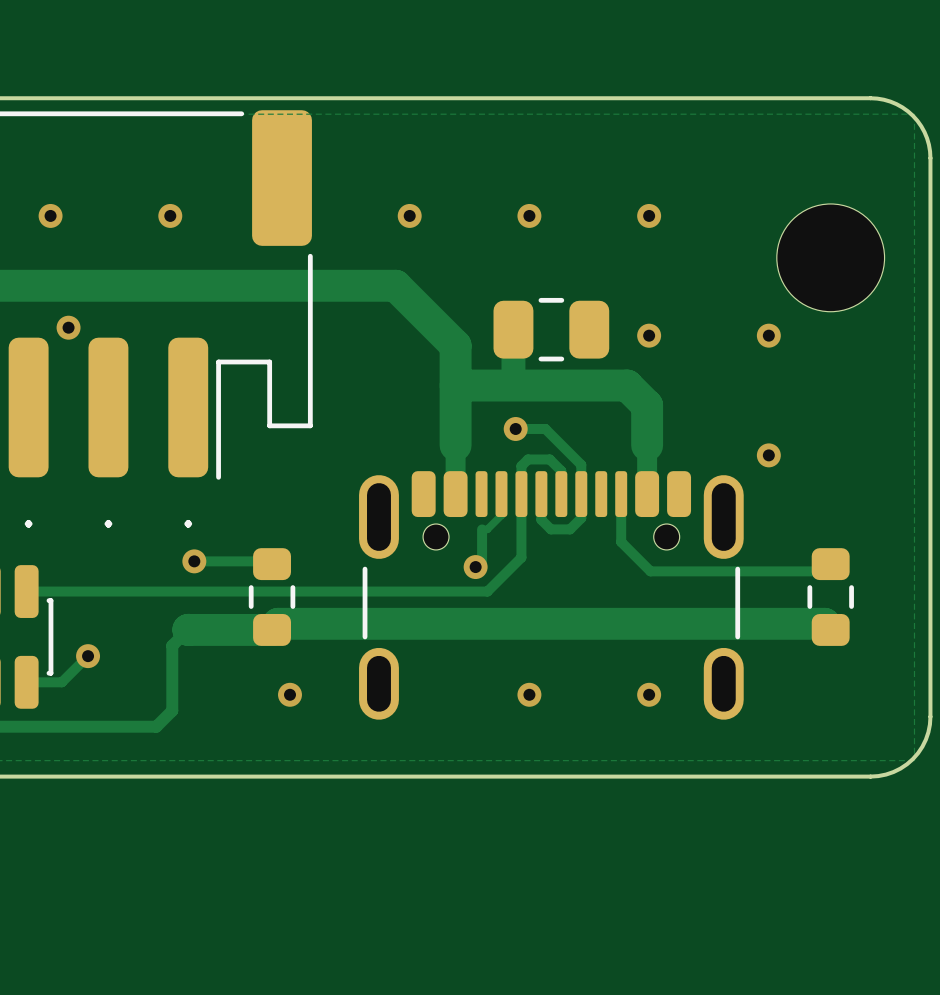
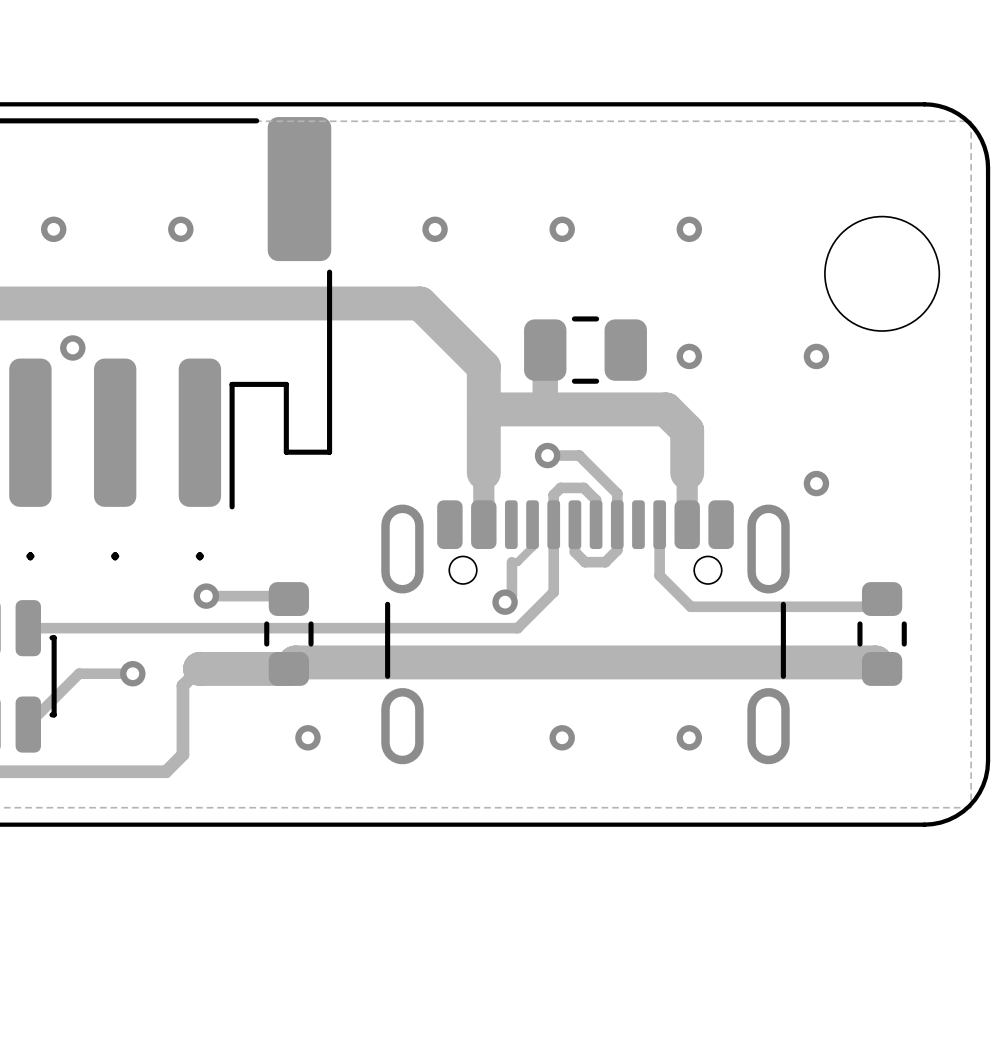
track: (88, 656) (61, 682) (26, 682) -> (132, 673) (79, 673) (28, 724)
via position: (88, 656) -> (132, 673)

